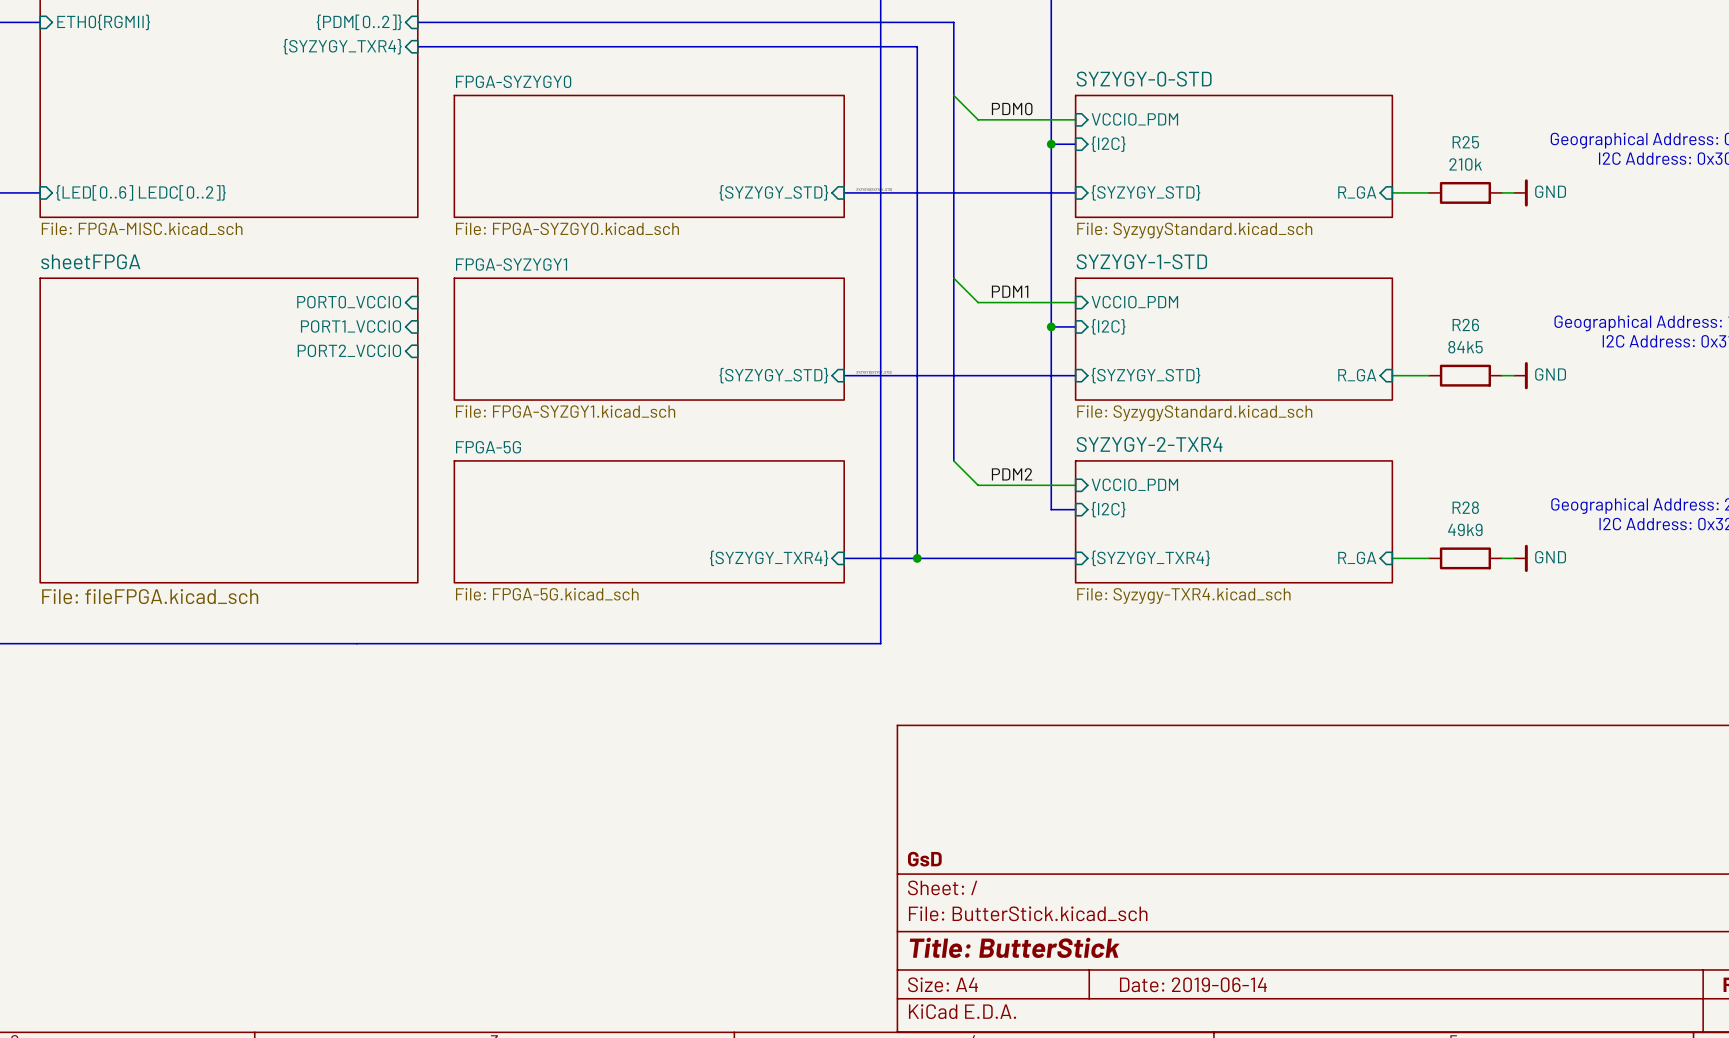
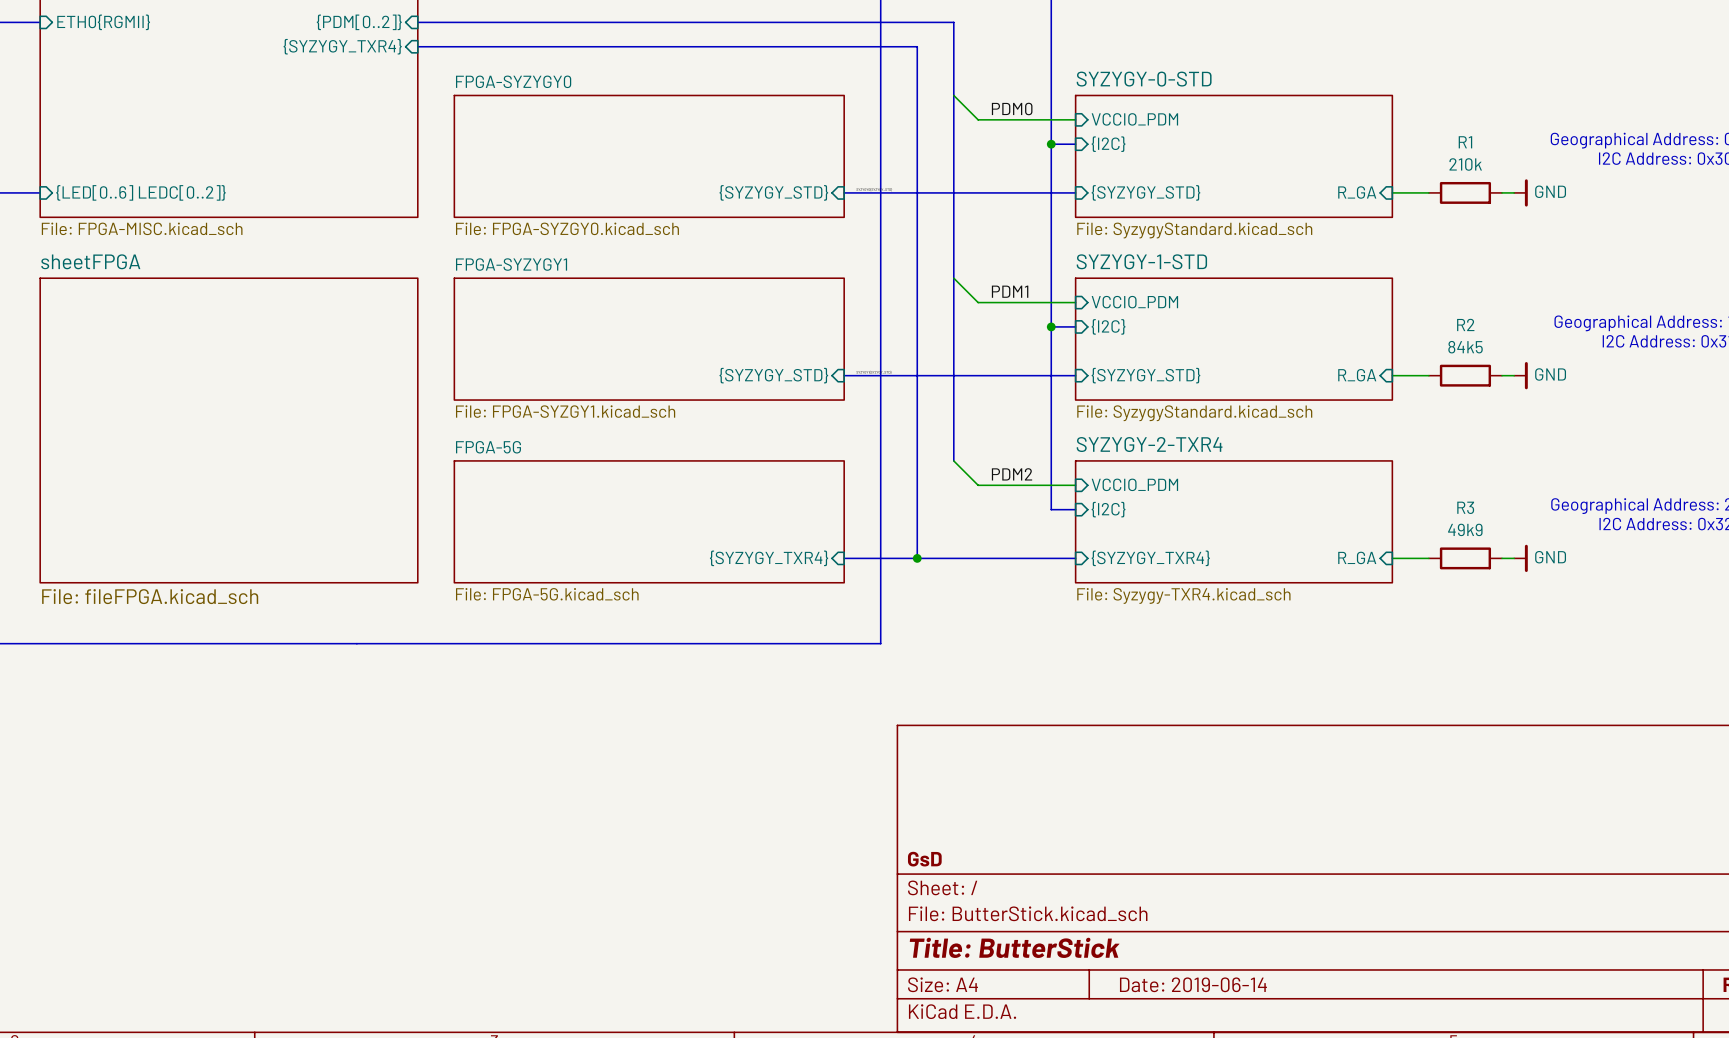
R25 name: R25 (1465, 142) -> R1 (1465, 142)
sheet pin: PORT0_VCCIO (349, 302) -> none
R26 name: R26 (1465, 325) -> R2 (1465, 324)
sheet pin: PORT1_VCCIO (351, 326) -> none
sheet pin: PORT2_VCCIO (349, 350) -> none
R28 name: R28 (1465, 507) -> R3 (1465, 507)

